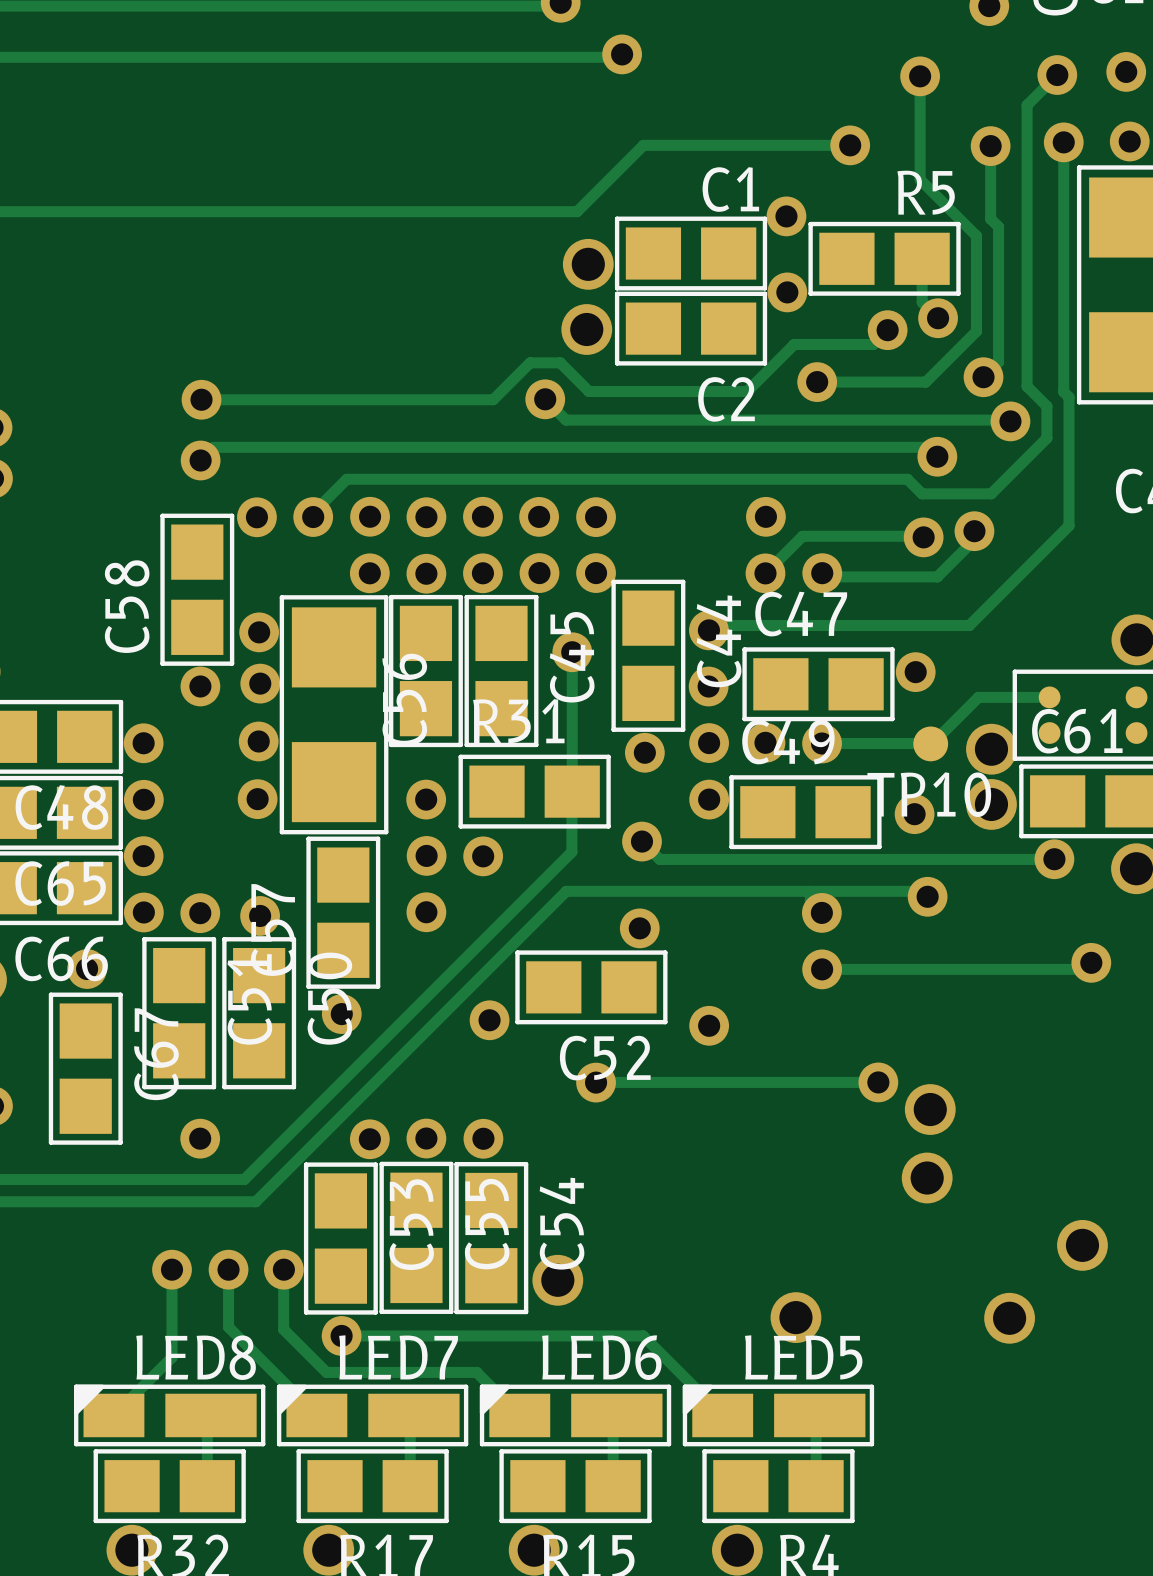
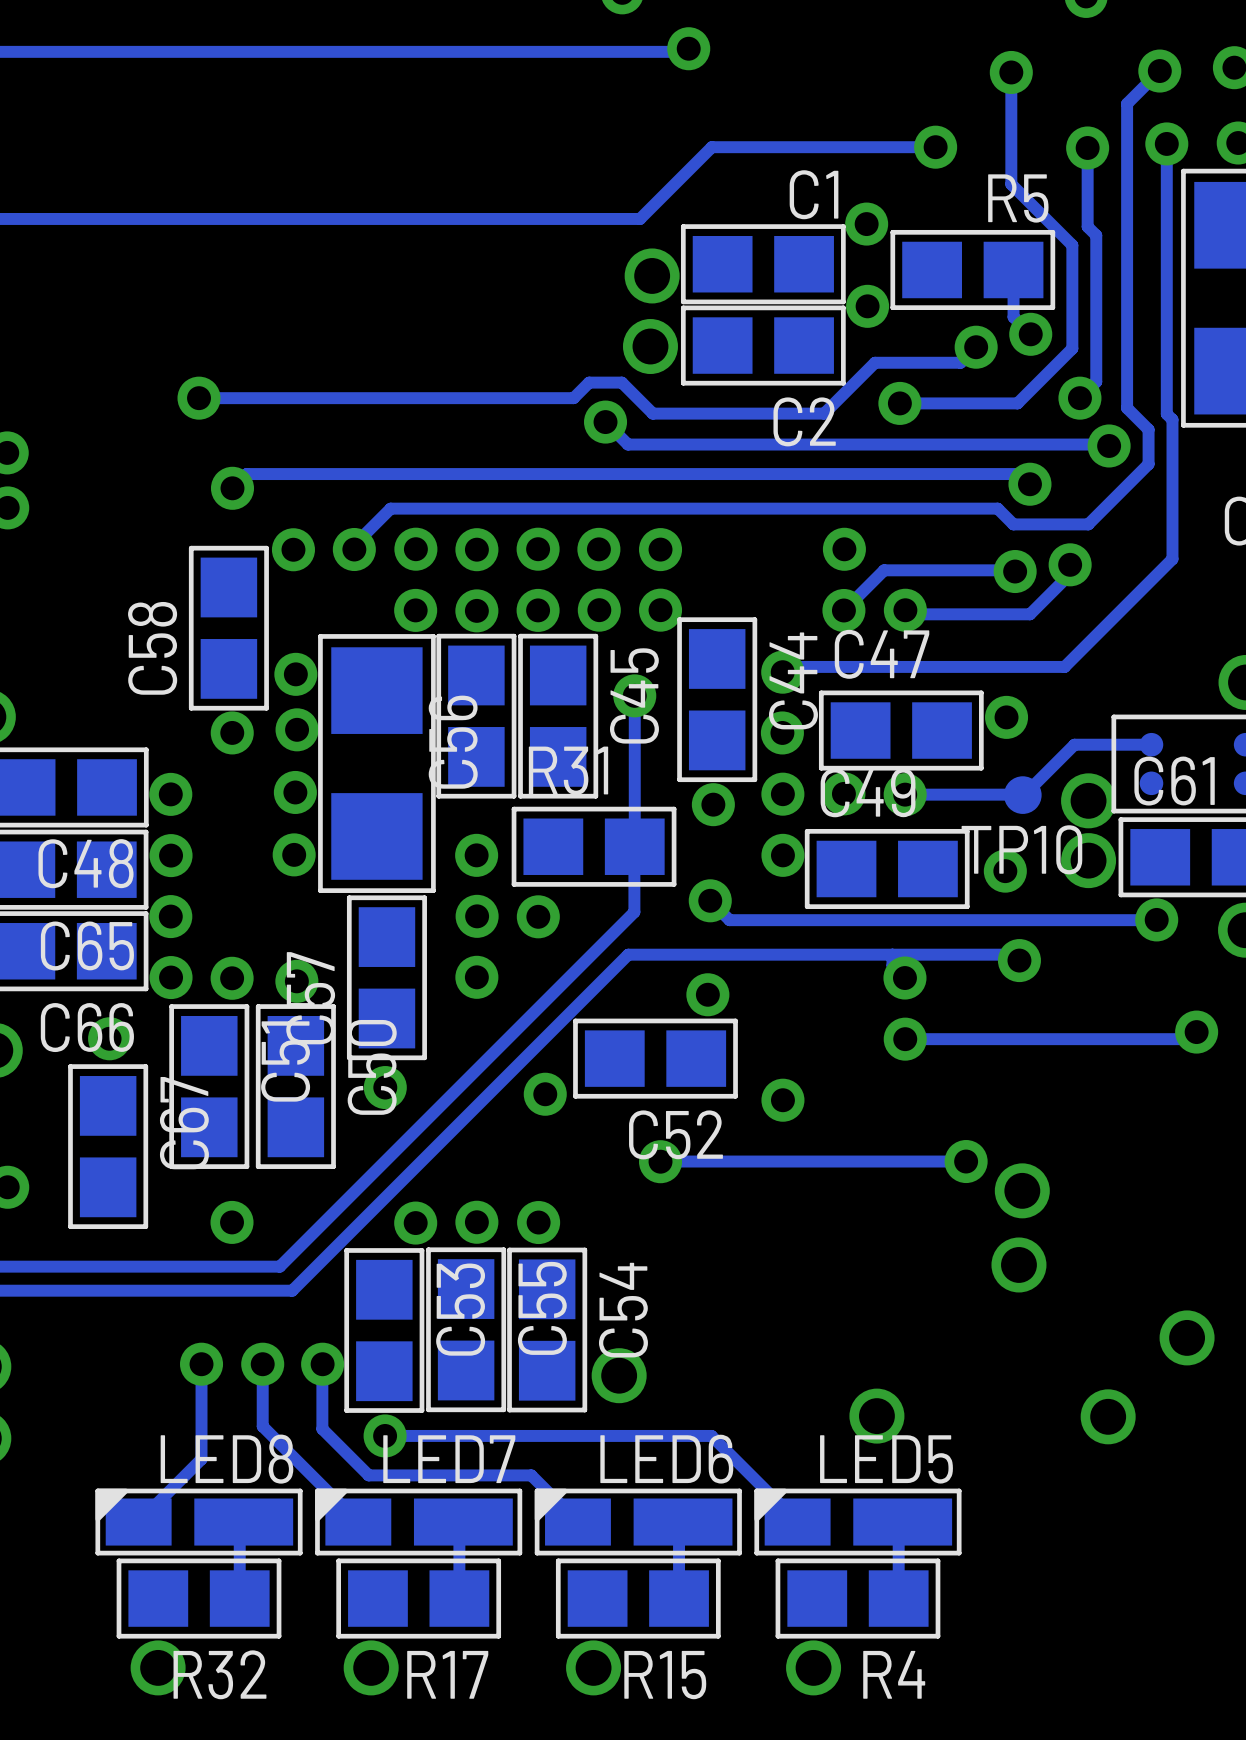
track: (515, 377) (493, 399) (201, 399) -> (573, 398) (199, 398)
via position: (201, 399) -> (199, 398)

